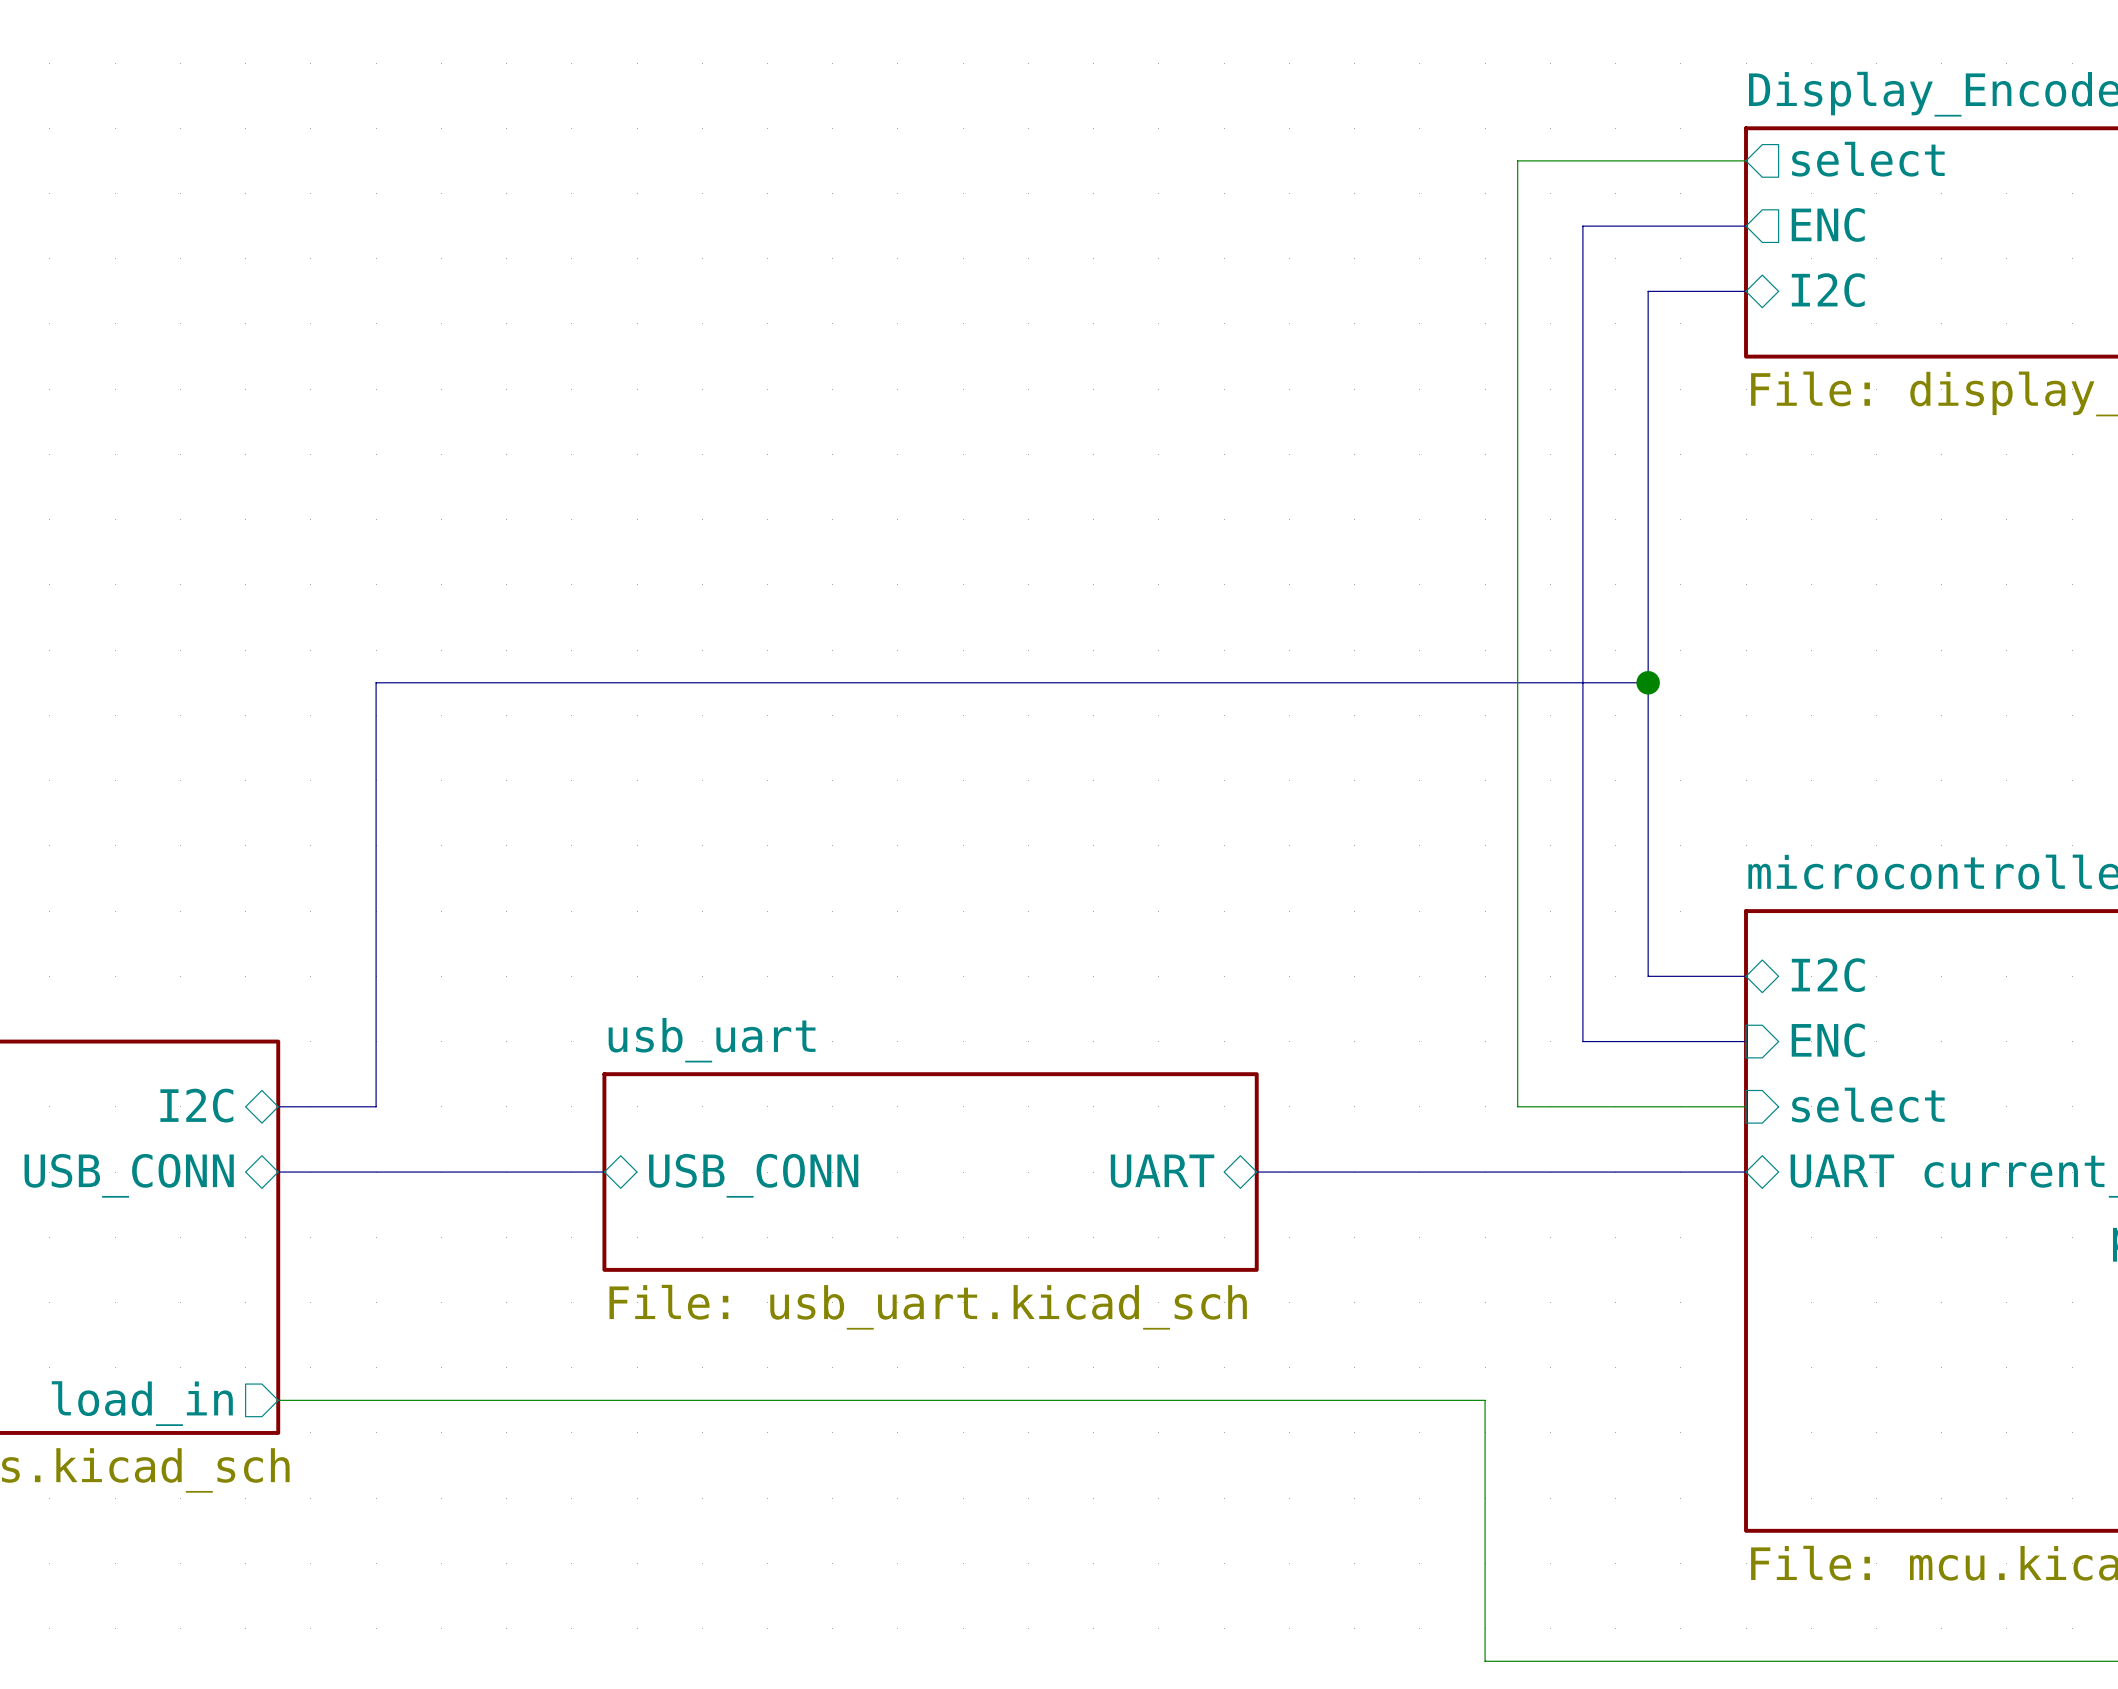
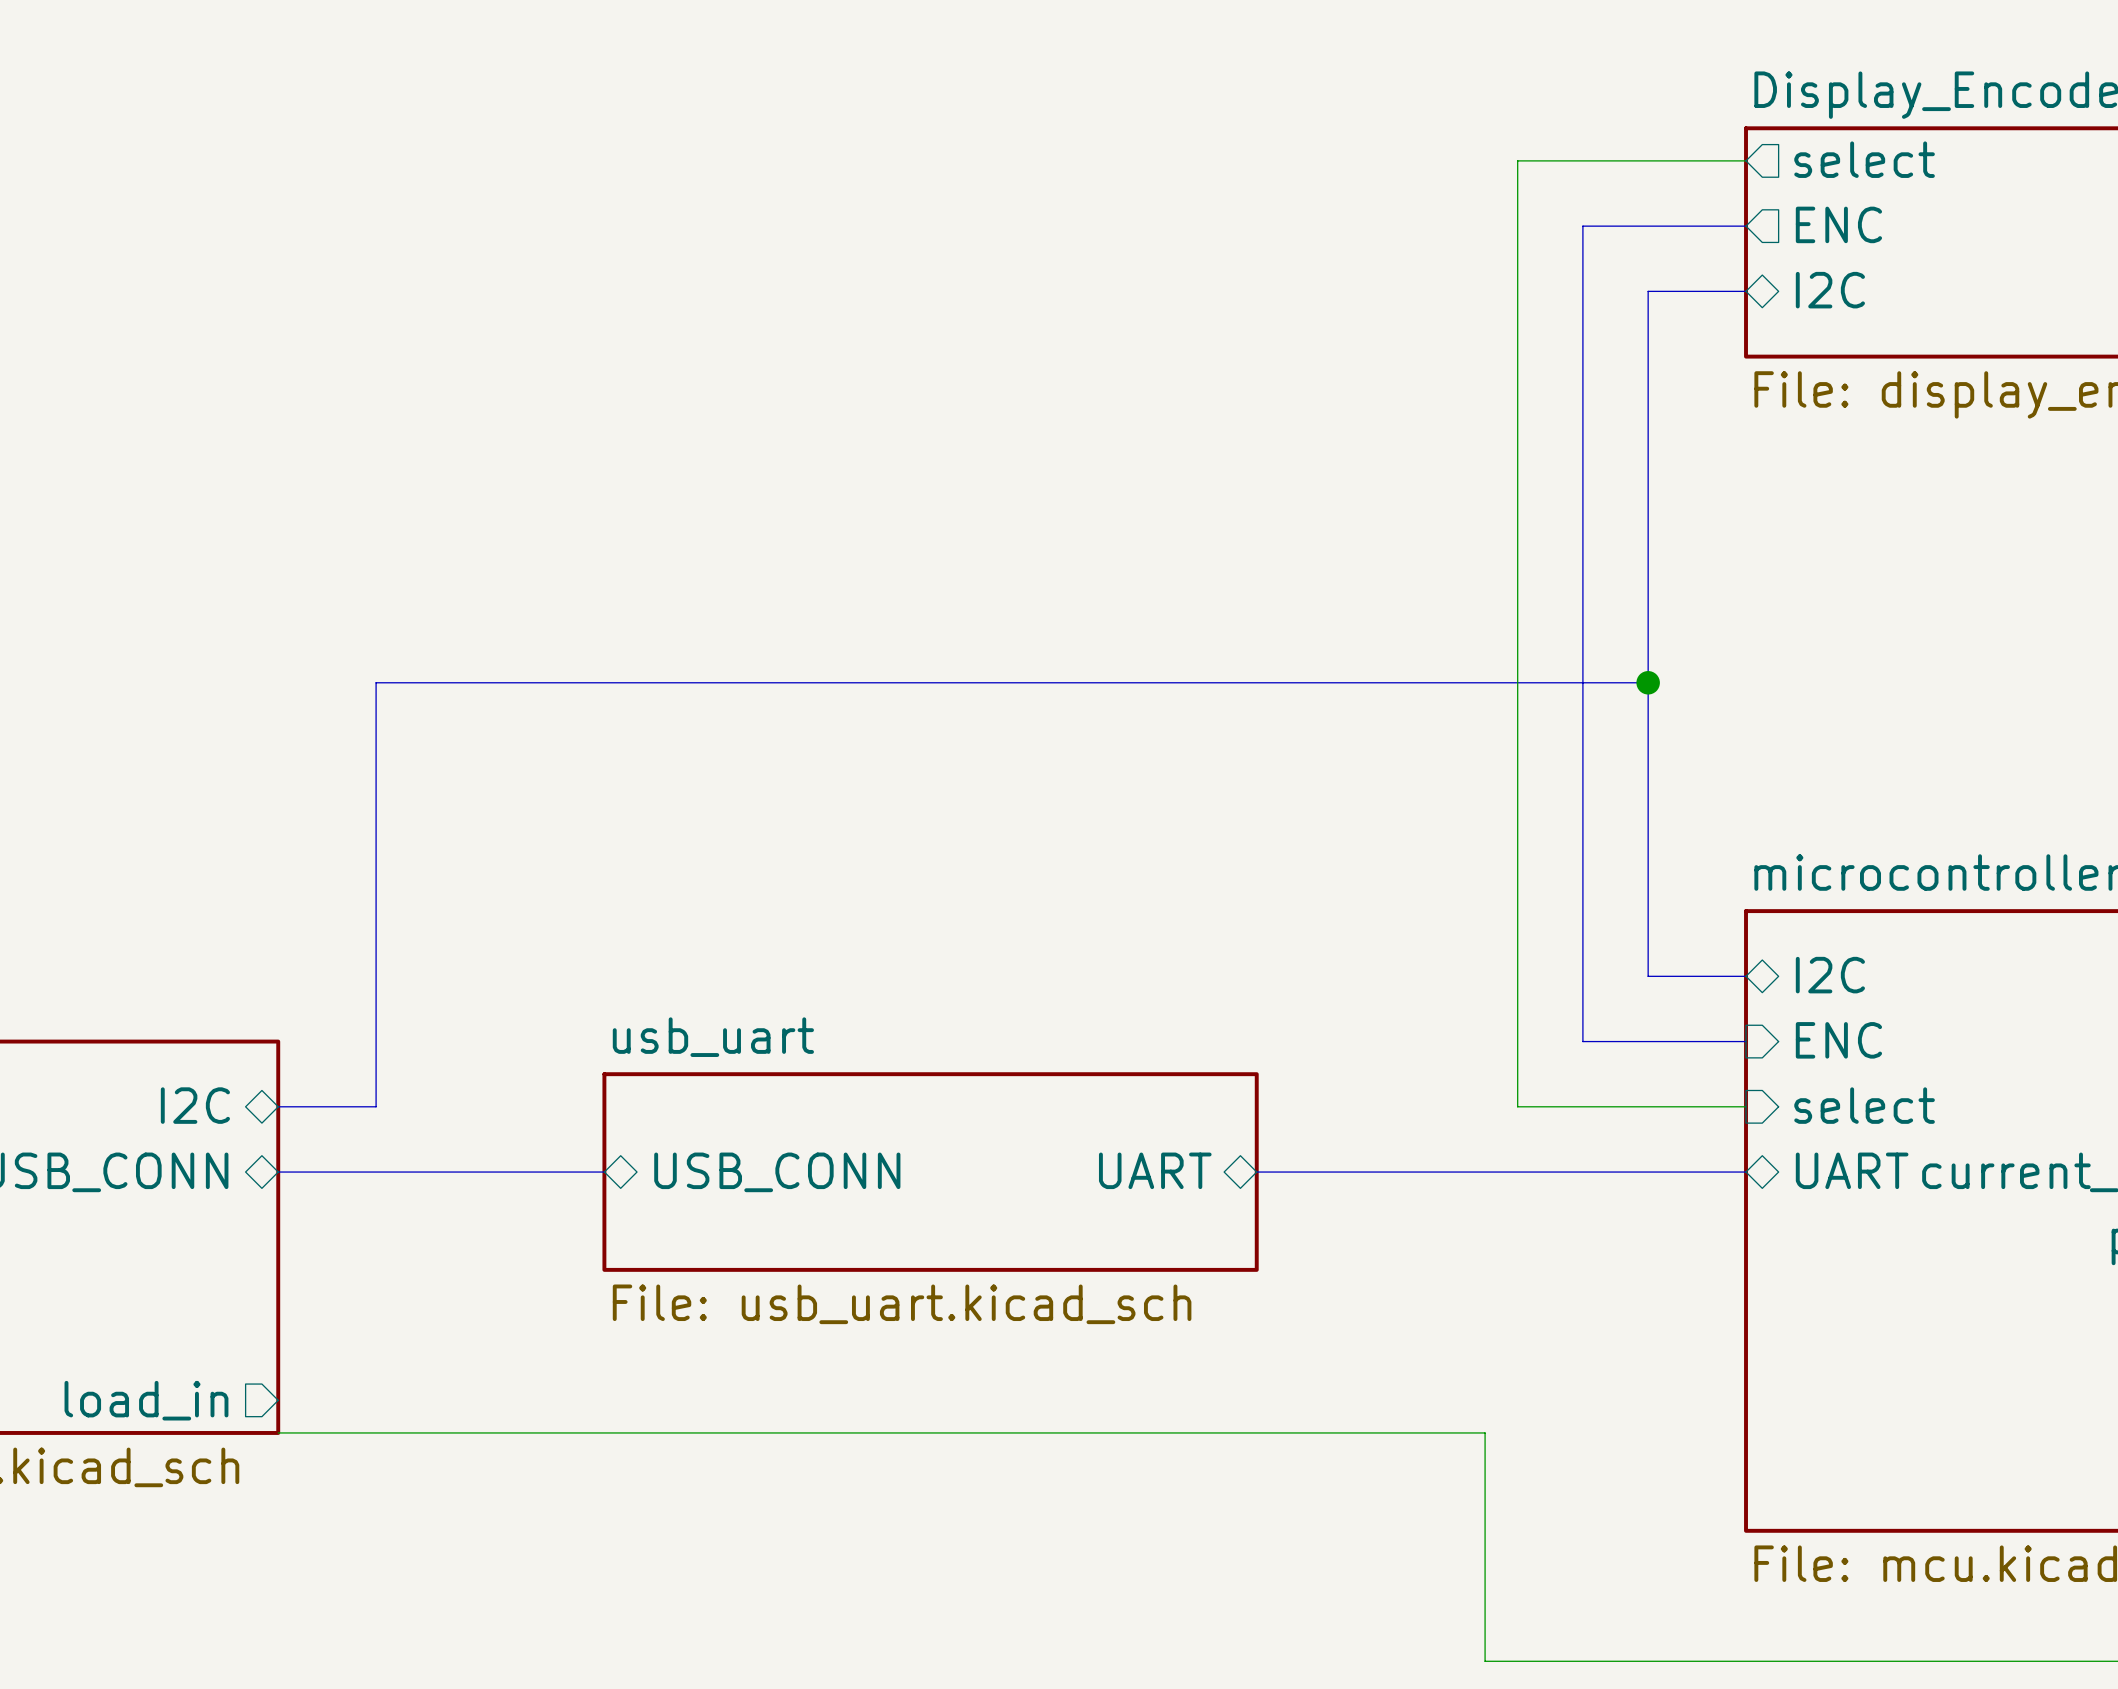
wire: (278, 1400) (1485, 1400) (1485, 1432) -> (278, 1432) (1485, 1432)

